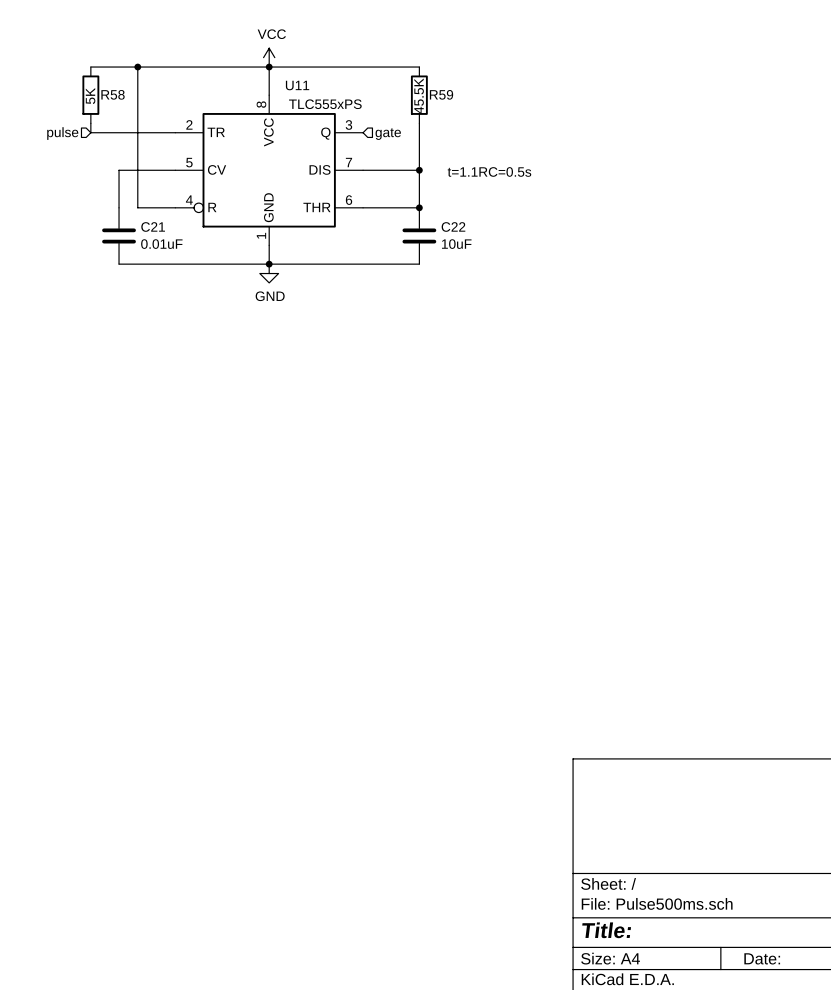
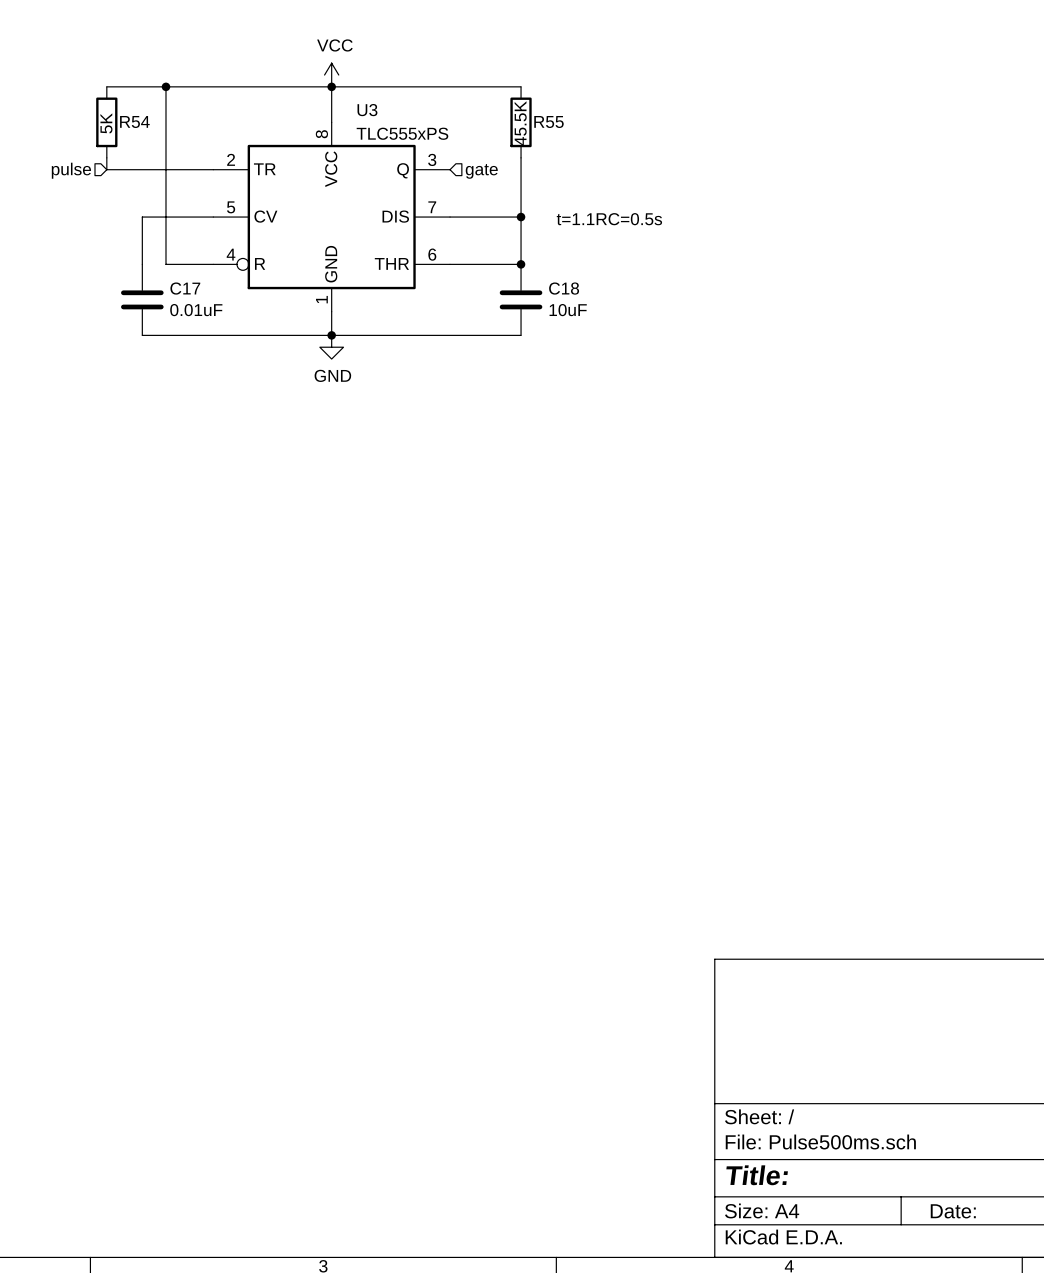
U11 name: U11 (297, 85) -> U3 (367, 110)
R58 name: R58 (113, 94) -> R54 (134, 122)
R59 name: R59 (441, 94) -> R55 (548, 122)
C21 name: C21 (153, 226) -> C17 (185, 288)
C22 name: C22 (453, 226) -> C18 (564, 288)

